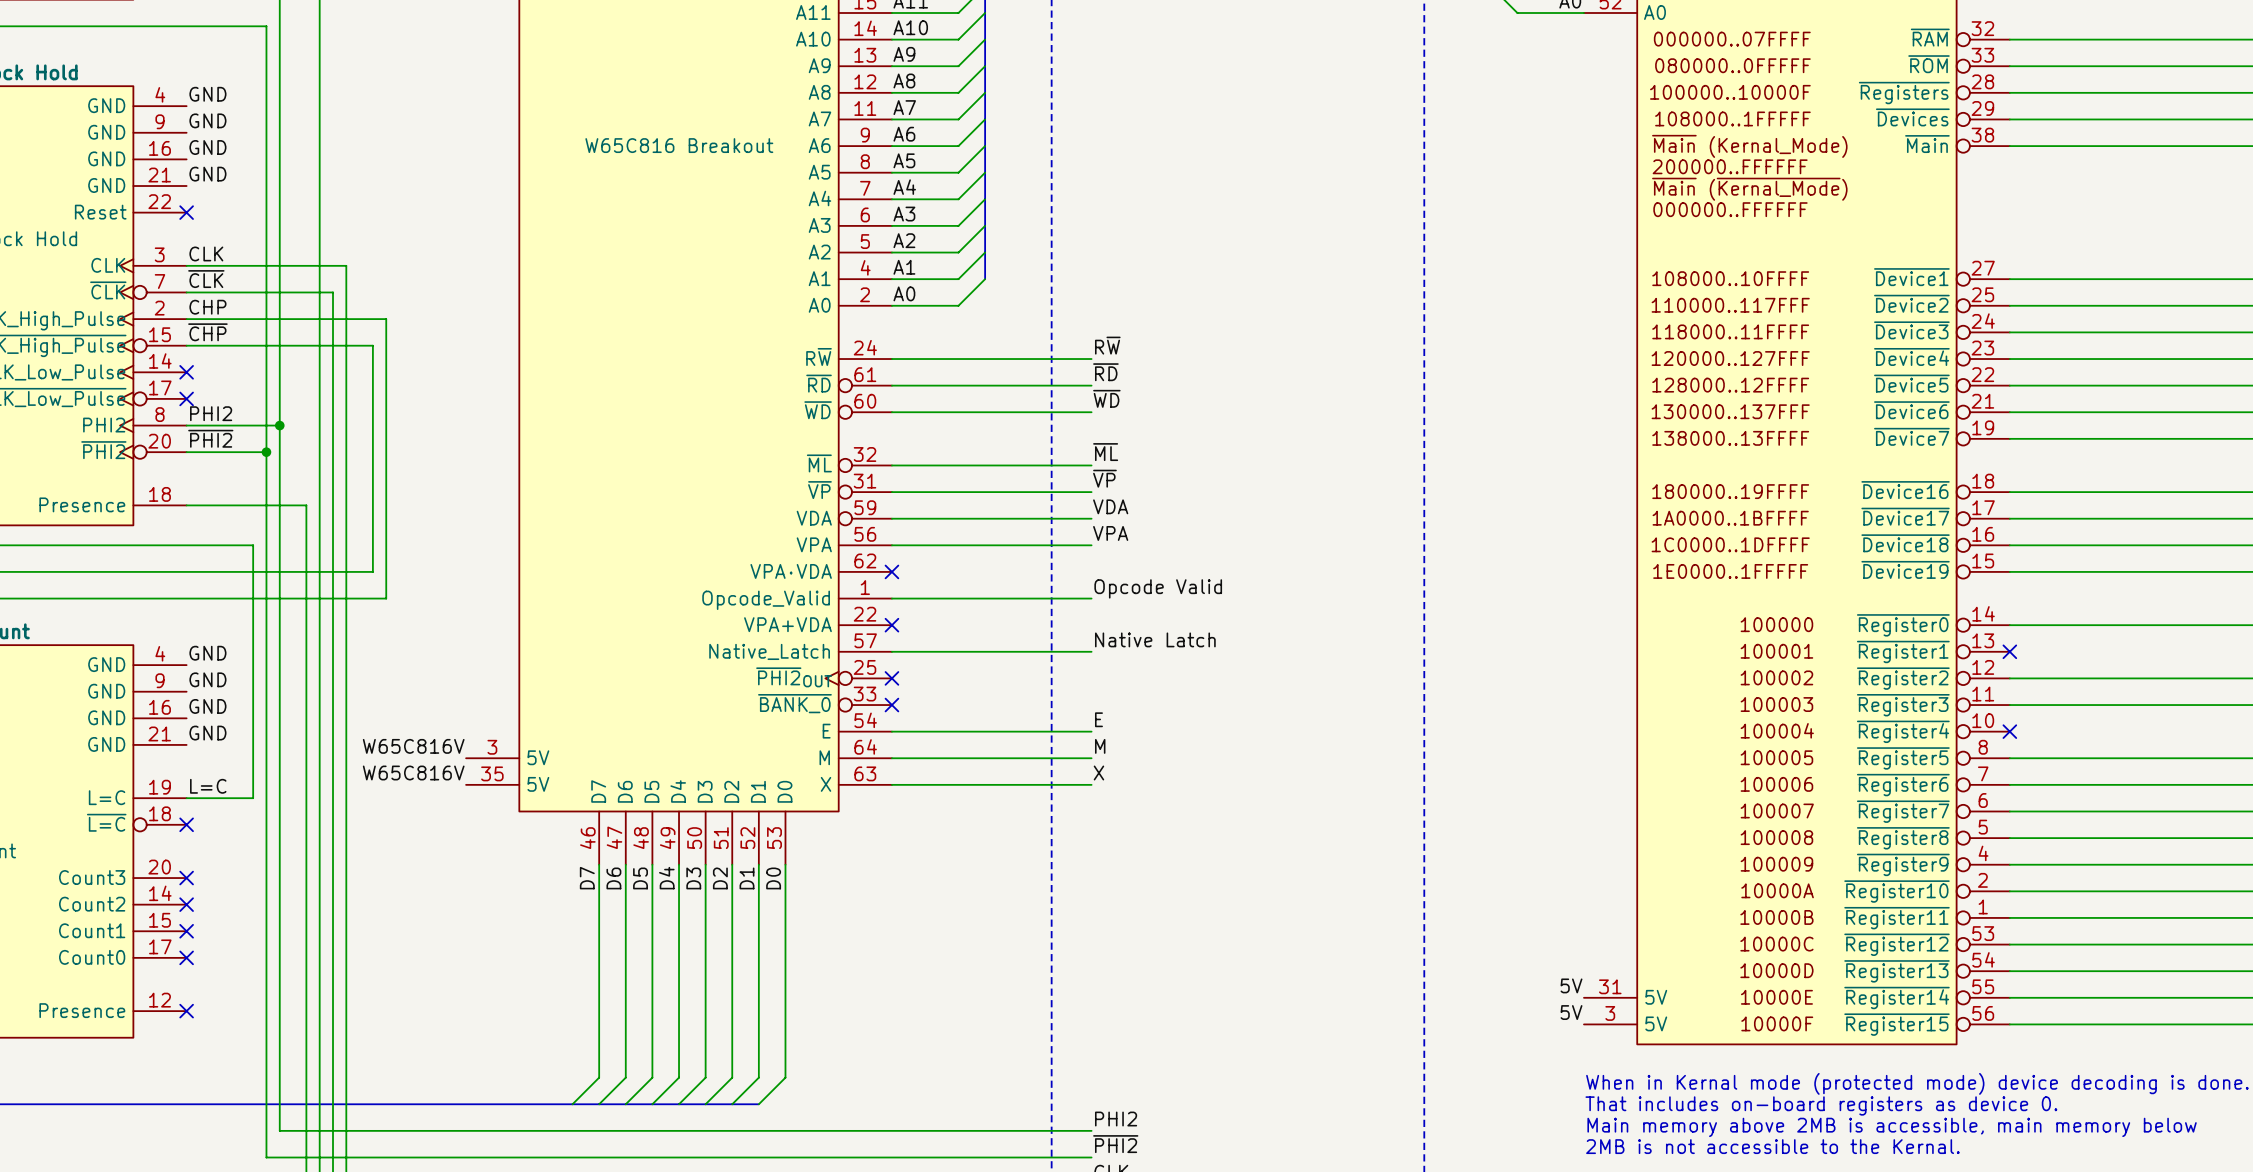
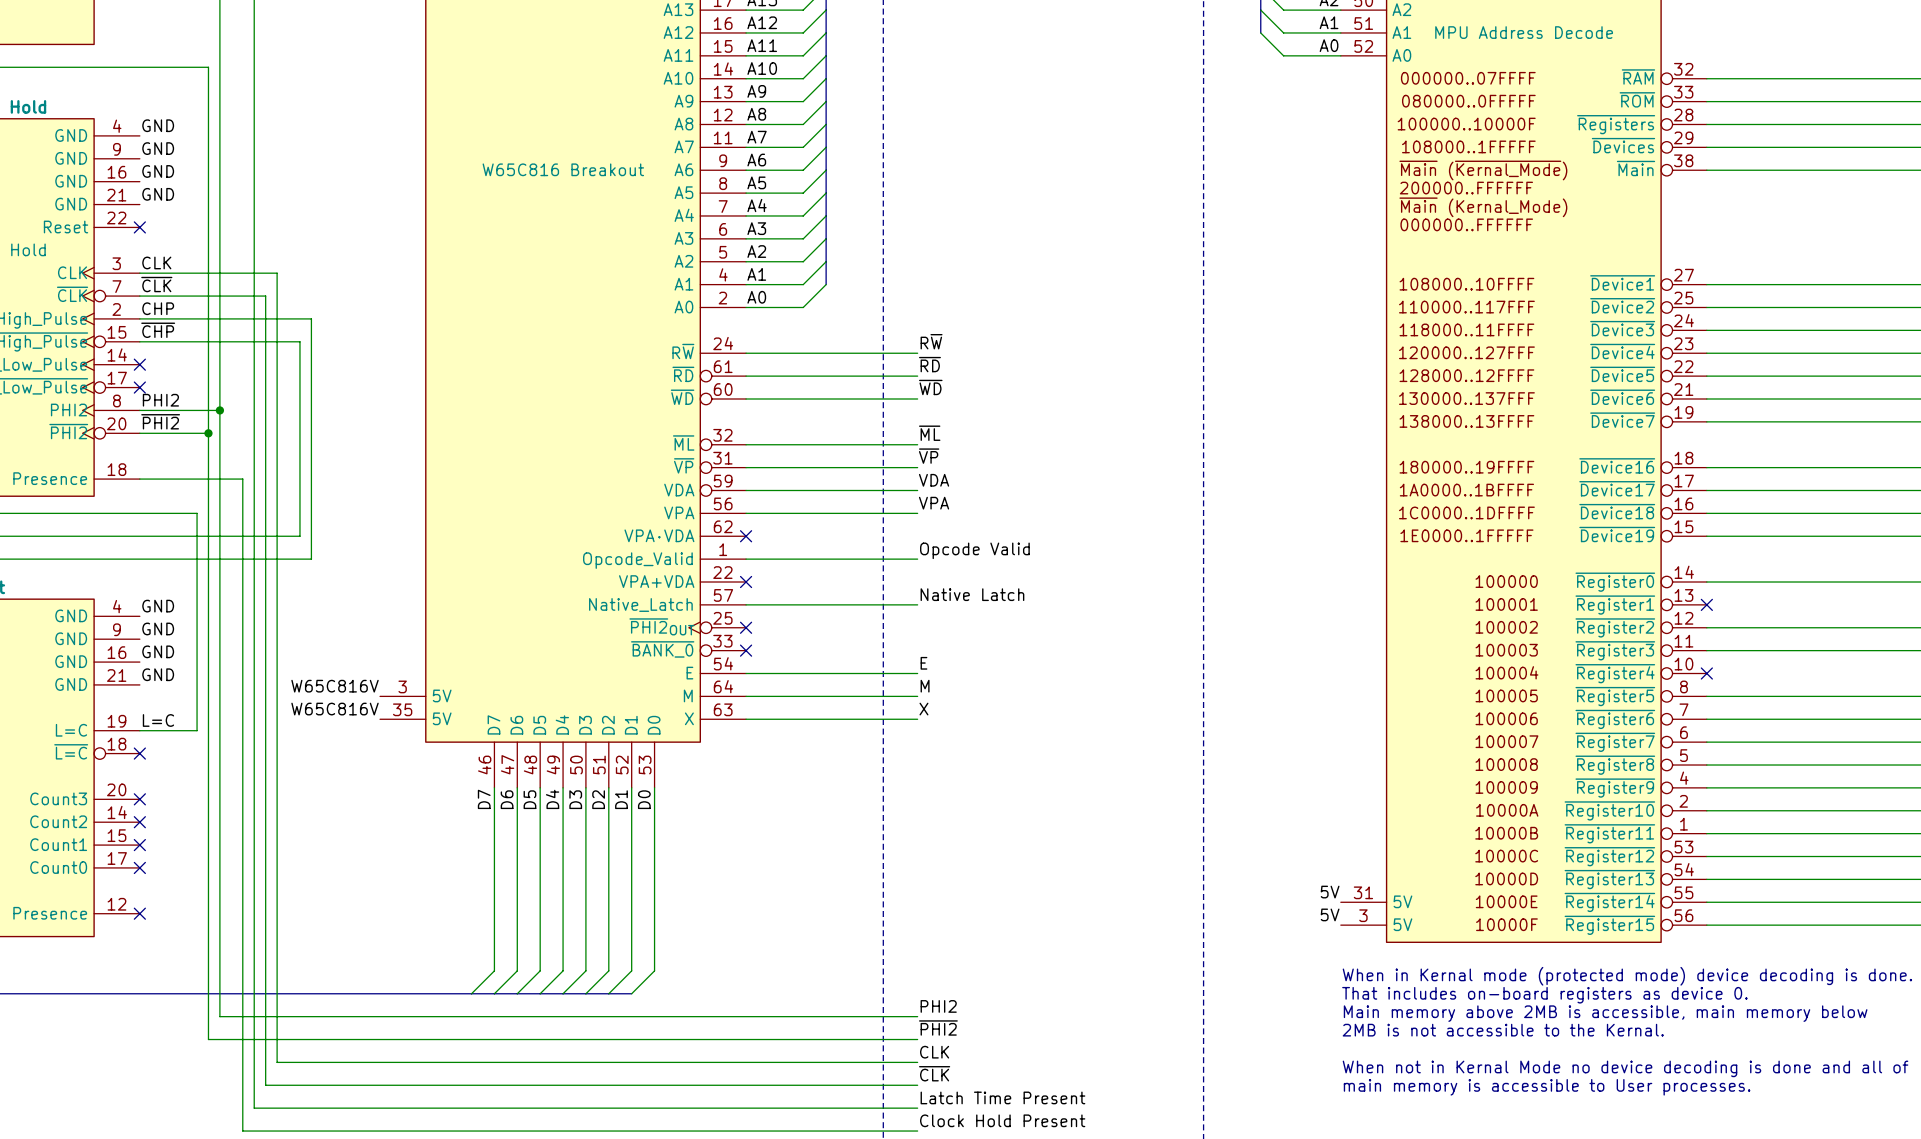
part text: ~{Main} (Kernal_Mode) (1749, 146) -> ~{Main} (~{Kernal_Mode}) (1483, 170)
part text: ~{Main} (~{Kernal_Mode}) (1749, 189) -> ~{Main} (Kernal_Mode) (1483, 207)

